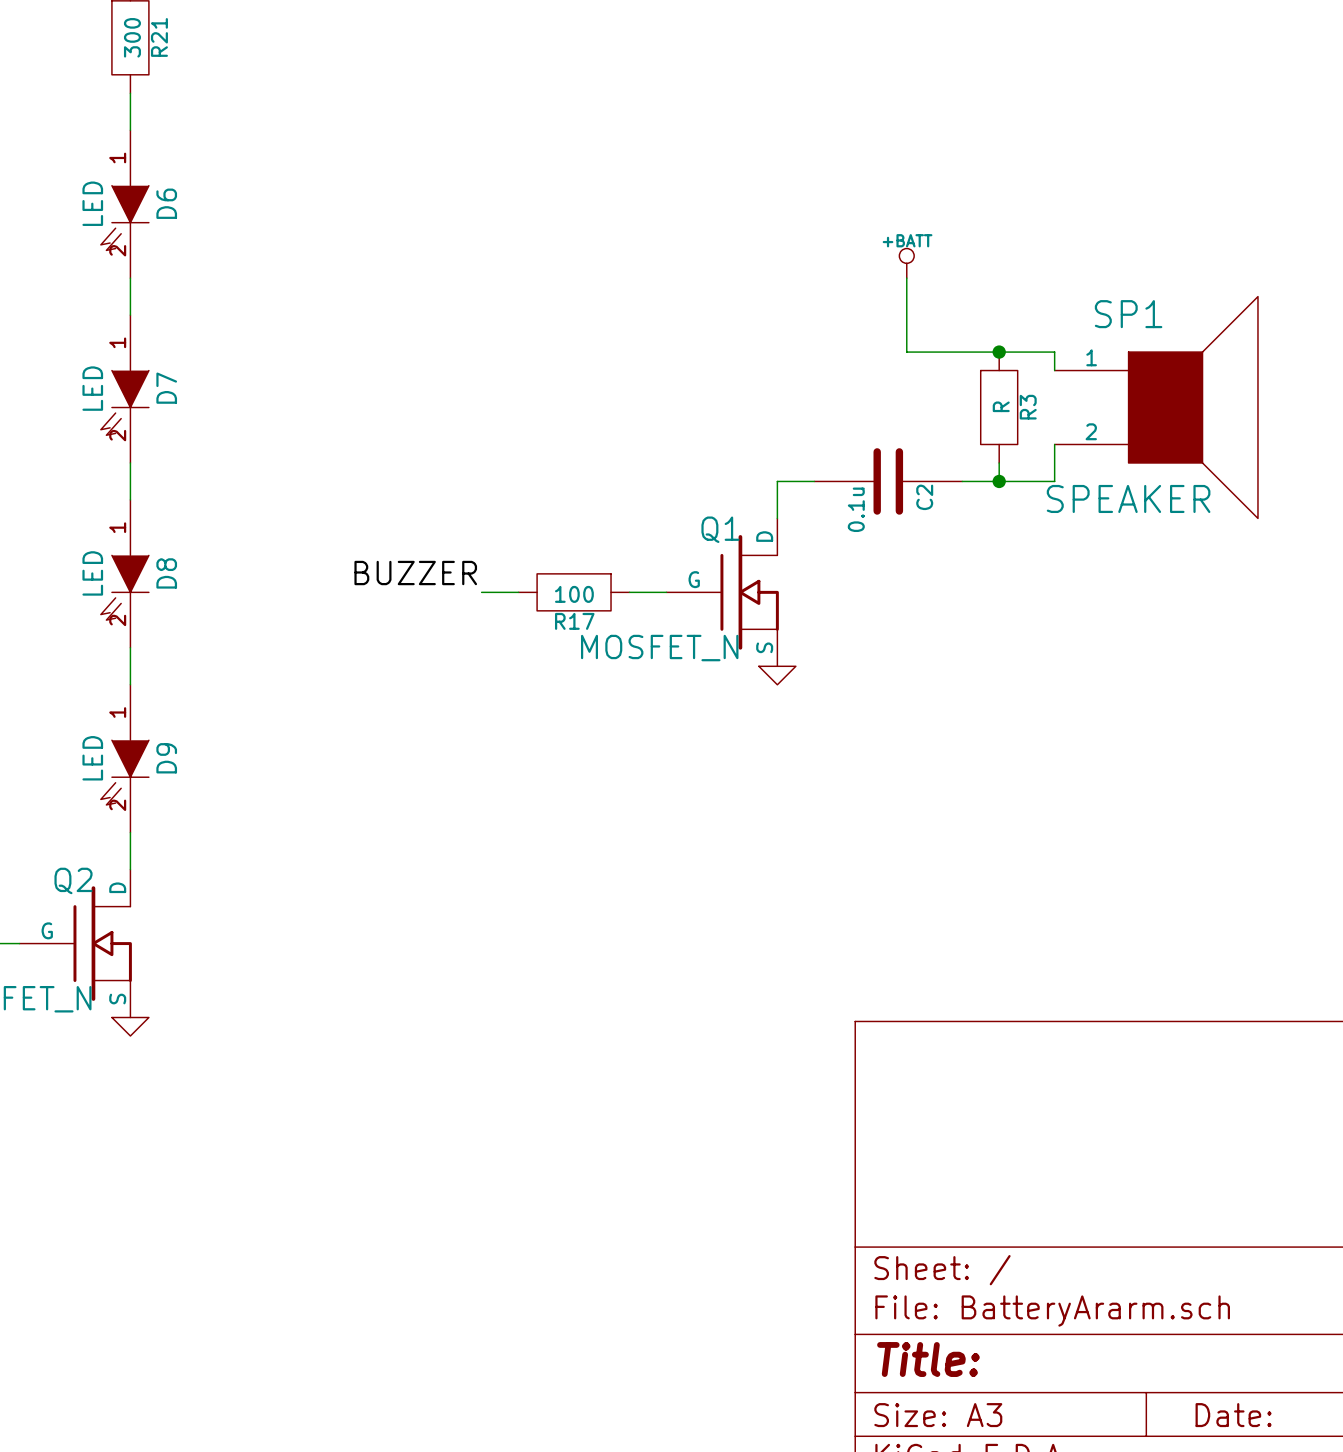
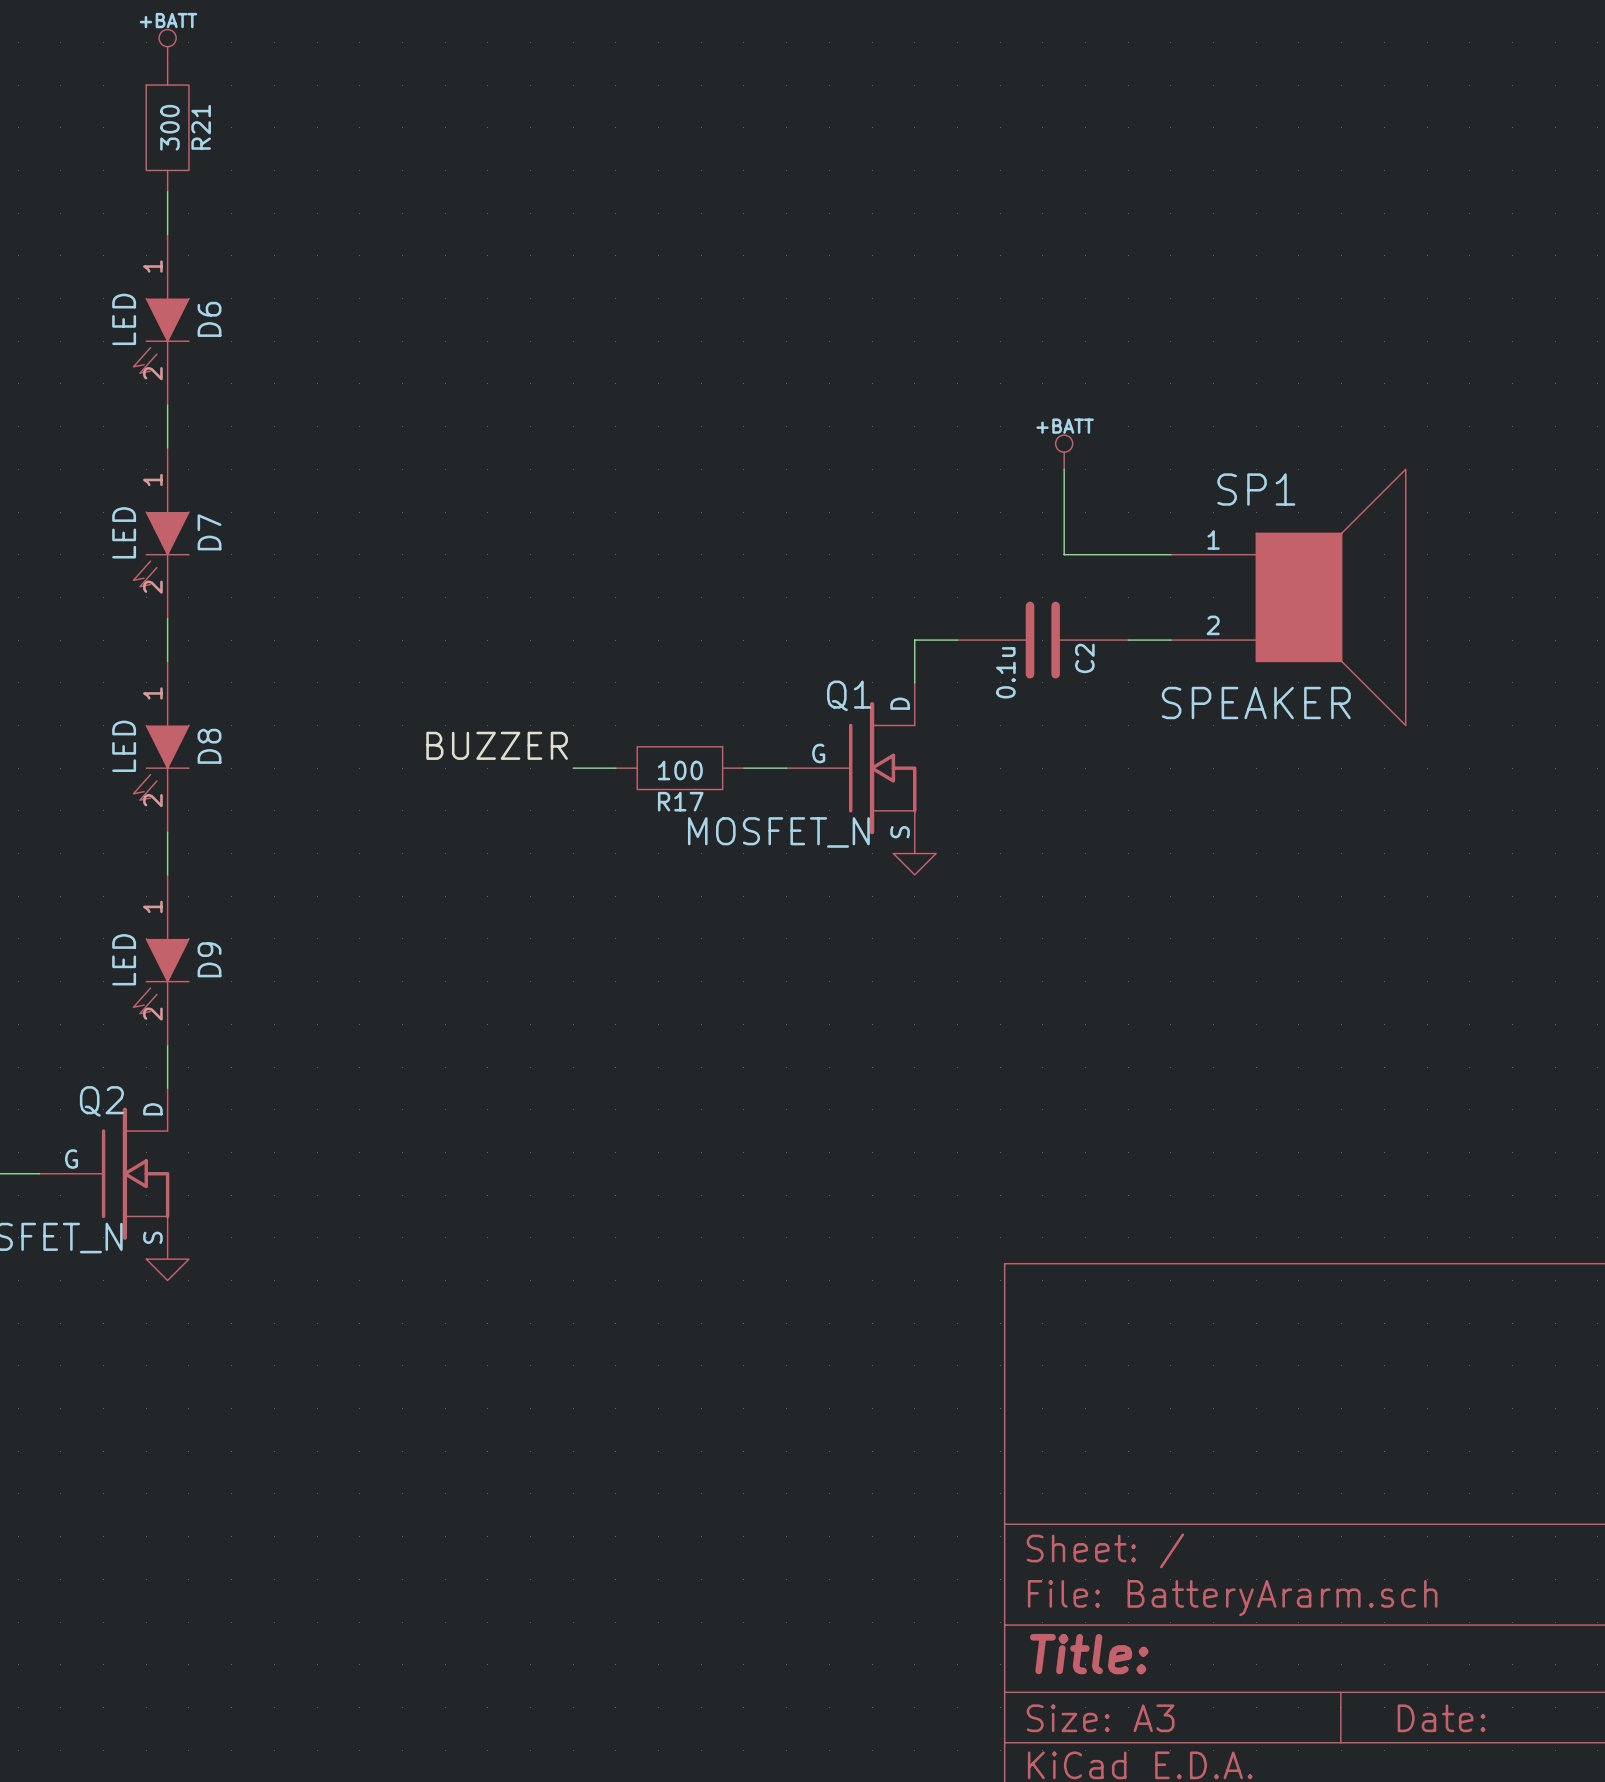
power symbol position: +BATT (906, 263) -> +BATT (1064, 452)
wire: (906, 278) (906, 333) -> none
wire: (906, 352) (1054, 352) (1054, 370) -> (1064, 490) (1064, 554) (1170, 554)
junction: (999, 352) -> none
R3: R (999, 407) -> none
SP1 position: (1156, 407) -> (1288, 597)
wire: (1054, 444) (1054, 481) (999, 481) (999, 462) -> none
junction: (999, 481) -> none

